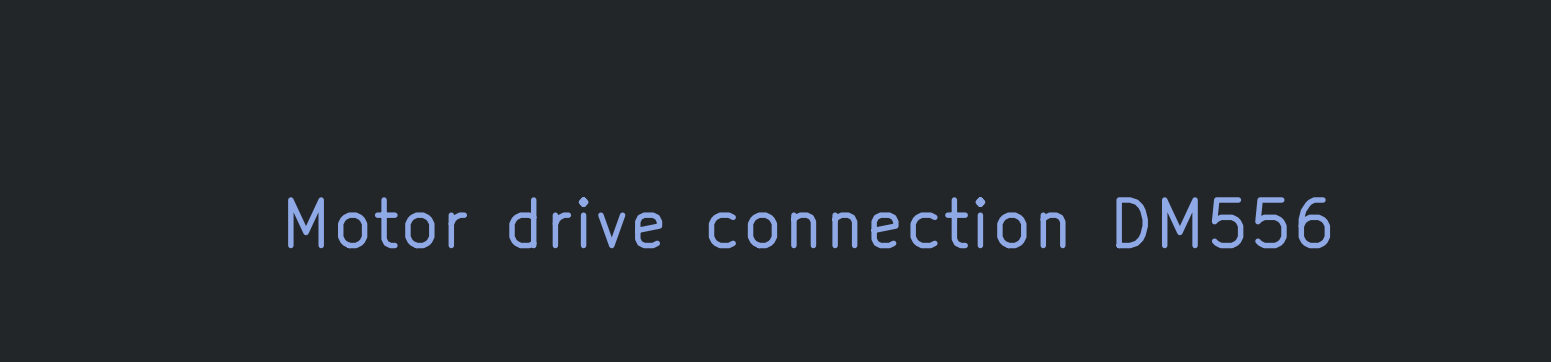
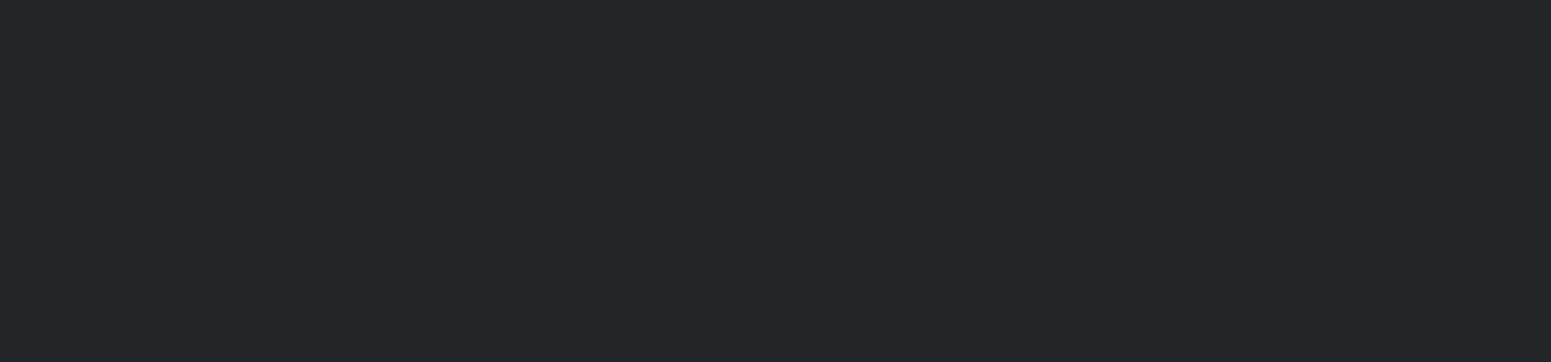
text: Motor drive connection DM556 (809, 222) -> none

